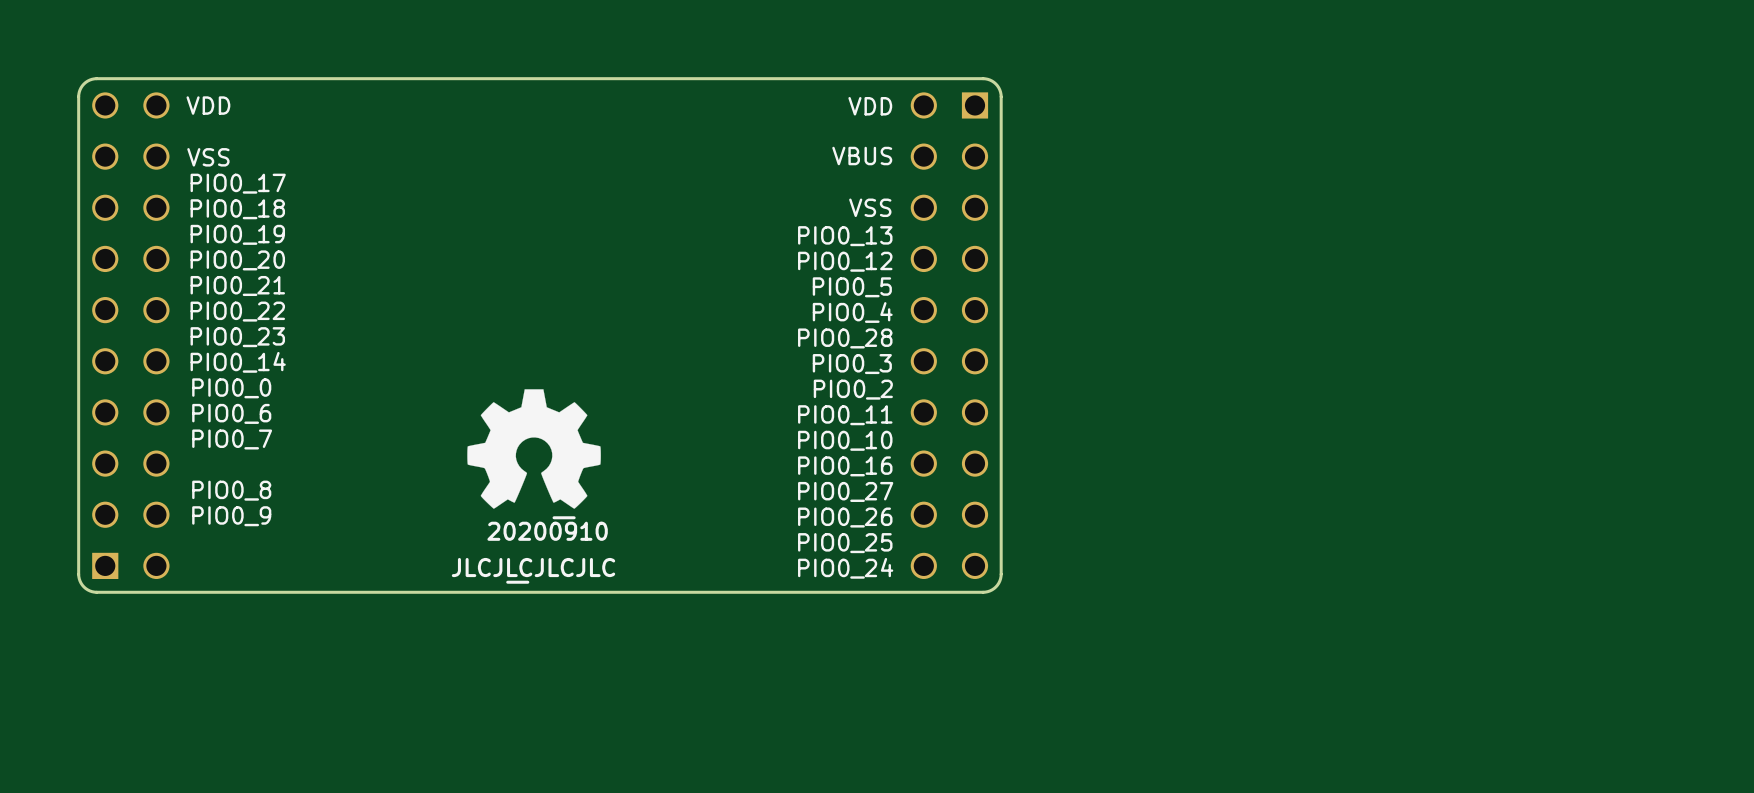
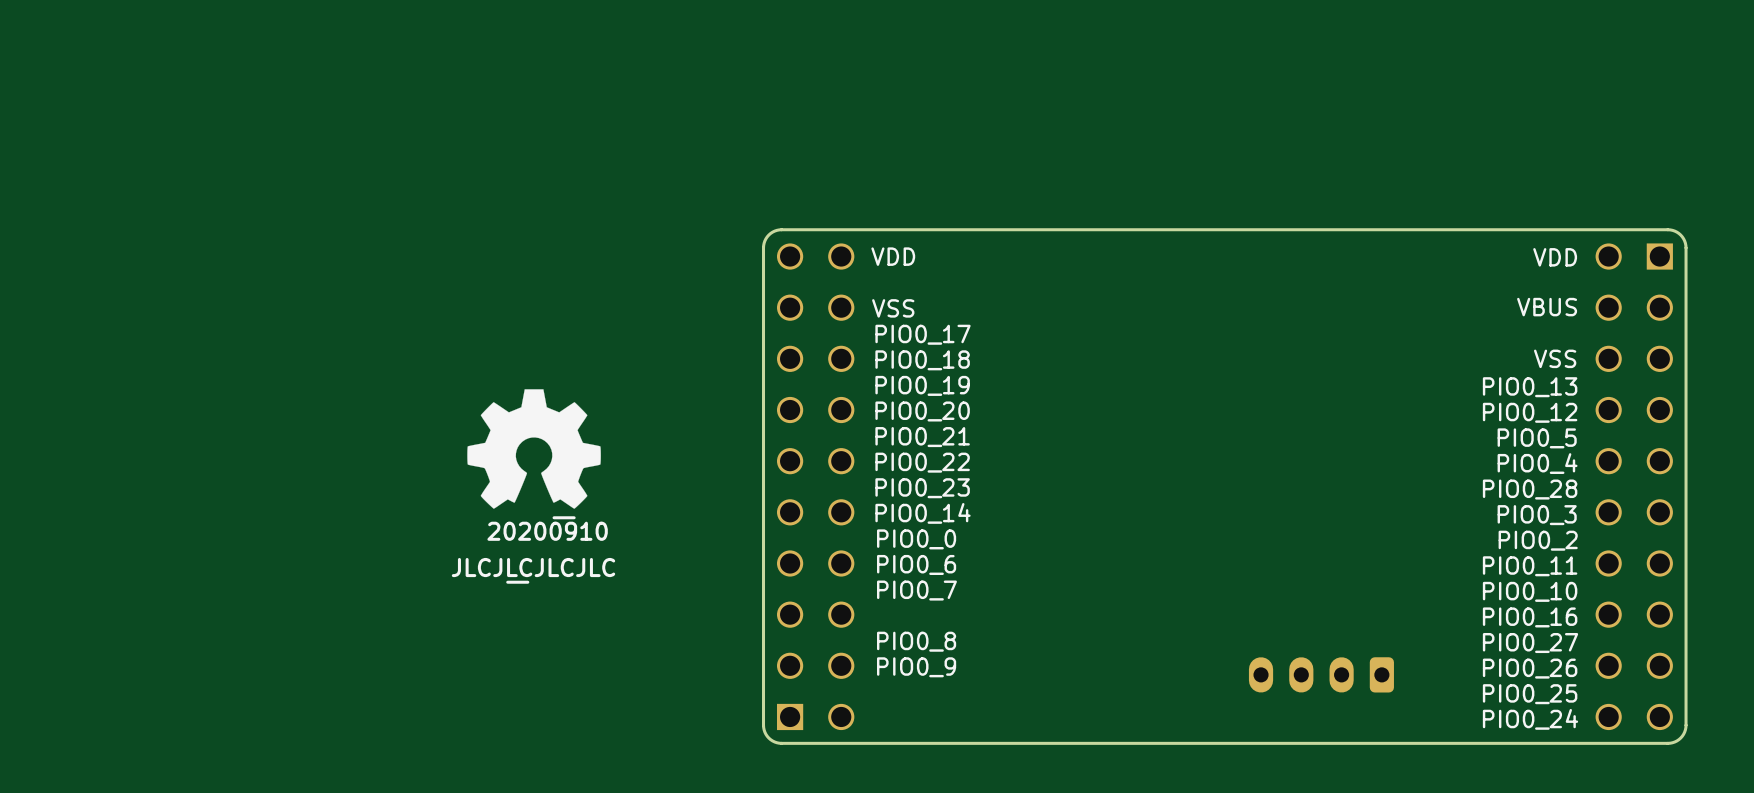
board edge: (983, 78) (96, 78) (87, 81) (81, 87) (78, 96) (78, 574) (81, 583) (87, 589) (96, 592) (983, 592) (992, 589) (998, 583) (1001, 574) (1001, 96) (995, 83) (983, 78) -> none
text: VDD (208, 105) -> none
text position: VDD (870, 106) -> VDD (893, 256)
text: VBUS (862, 156) -> none
text: VSS (208, 157) -> none
text: PIO0_17 (238, 183) -> none
text position: VSS (870, 207) -> VSS (893, 308)
text: PIO0_18 (237, 209) -> none
board edge: none -> (1667, 229) (781, 229) (772, 232) (765, 238) (763, 247) (763, 725) (765, 734) (772, 740) (781, 743) (1667, 743) (1676, 740) (1683, 734) (1686, 725) (1686, 247) (1680, 235) (1667, 229)
text: PIO0_19 (237, 234) -> none
text: PIO0_13 (845, 236) -> none
text: none -> VDD (1555, 257)
text: PIO0_20 (237, 260) -> none
text: PIO0_12 (845, 261) -> none
text: PIO0_21 (237, 285) -> none
text: PIO0_5 (852, 287) -> none
text: none -> VBUS (1547, 307)
text: PIO0_22 (237, 311) -> none
text: PIO0_4 (852, 312) -> none
text: none -> PIO0_17 (922, 334)
part: (130, 335) -> none
part rotation: 0° (949, 335) -> 180° (815, 486)
text: PIO0_23 (237, 337) -> none
text: PIO0_28 (845, 338) -> none
text: none -> VSS (1555, 358)
text: none -> PIO0_18 (922, 360)
text: PIO0_14 (238, 362) -> none
text: PIO0_3 (852, 364) -> none
text: none -> PIO0_19 (922, 385)
text: none -> PIO0_13 (1530, 387)
text: PIO0_0 (231, 388) -> none
text: PIO0_2 (853, 389) -> none
text: none -> PIO0_20 (922, 411)
text: none -> PIO0_12 (1530, 412)
text: PIO0_6 (231, 413) -> none
text: PIO0_11 (845, 415) -> none
text: none -> PIO0_21 (922, 437)
text: none -> PIO0_5 (1537, 438)
text: PIO0_7 (232, 439) -> none
text: PIO0_10 (845, 440) -> none
text: none -> PIO0_22 (922, 462)
text: none -> PIO0_4 (1537, 463)
text: PIO0_16 (845, 466) -> none
part: none -> (1634, 486)
text: none -> PIO0_23 (922, 488)
text: none -> PIO0_28 (1530, 489)
text: PIO0_8 (231, 490) -> none
text: PIO0_27 (845, 491) -> none
text: none -> PIO0_14 (922, 513)
text: none -> PIO0_3 (1537, 515)
text: PIO0_9 (231, 516) -> none
text: PIO0_26 (845, 517) -> none
text: none -> PIO0_0 (916, 539)
text: none -> PIO0_2 (1538, 540)
text: PIO0_25 (845, 543) -> none
text: none -> PIO0_6 (916, 564)
text: none -> PIO0_11 (1530, 566)
text: PIO0_24 (845, 568) -> none
text: none -> PIO0_7 (916, 590)
text: none -> PIO0_10 (1530, 591)
text: none -> PIO0_16 (1530, 617)
text: none -> PIO0_8 (916, 641)
text: none -> PIO0_27 (1530, 643)
text: none -> PIO0_9 (916, 667)
text: none -> PIO0_26 (1530, 668)
part: none -> (1321, 674)
text: none -> PIO0_25 (1530, 694)
text: none -> PIO0_24 (1530, 719)

